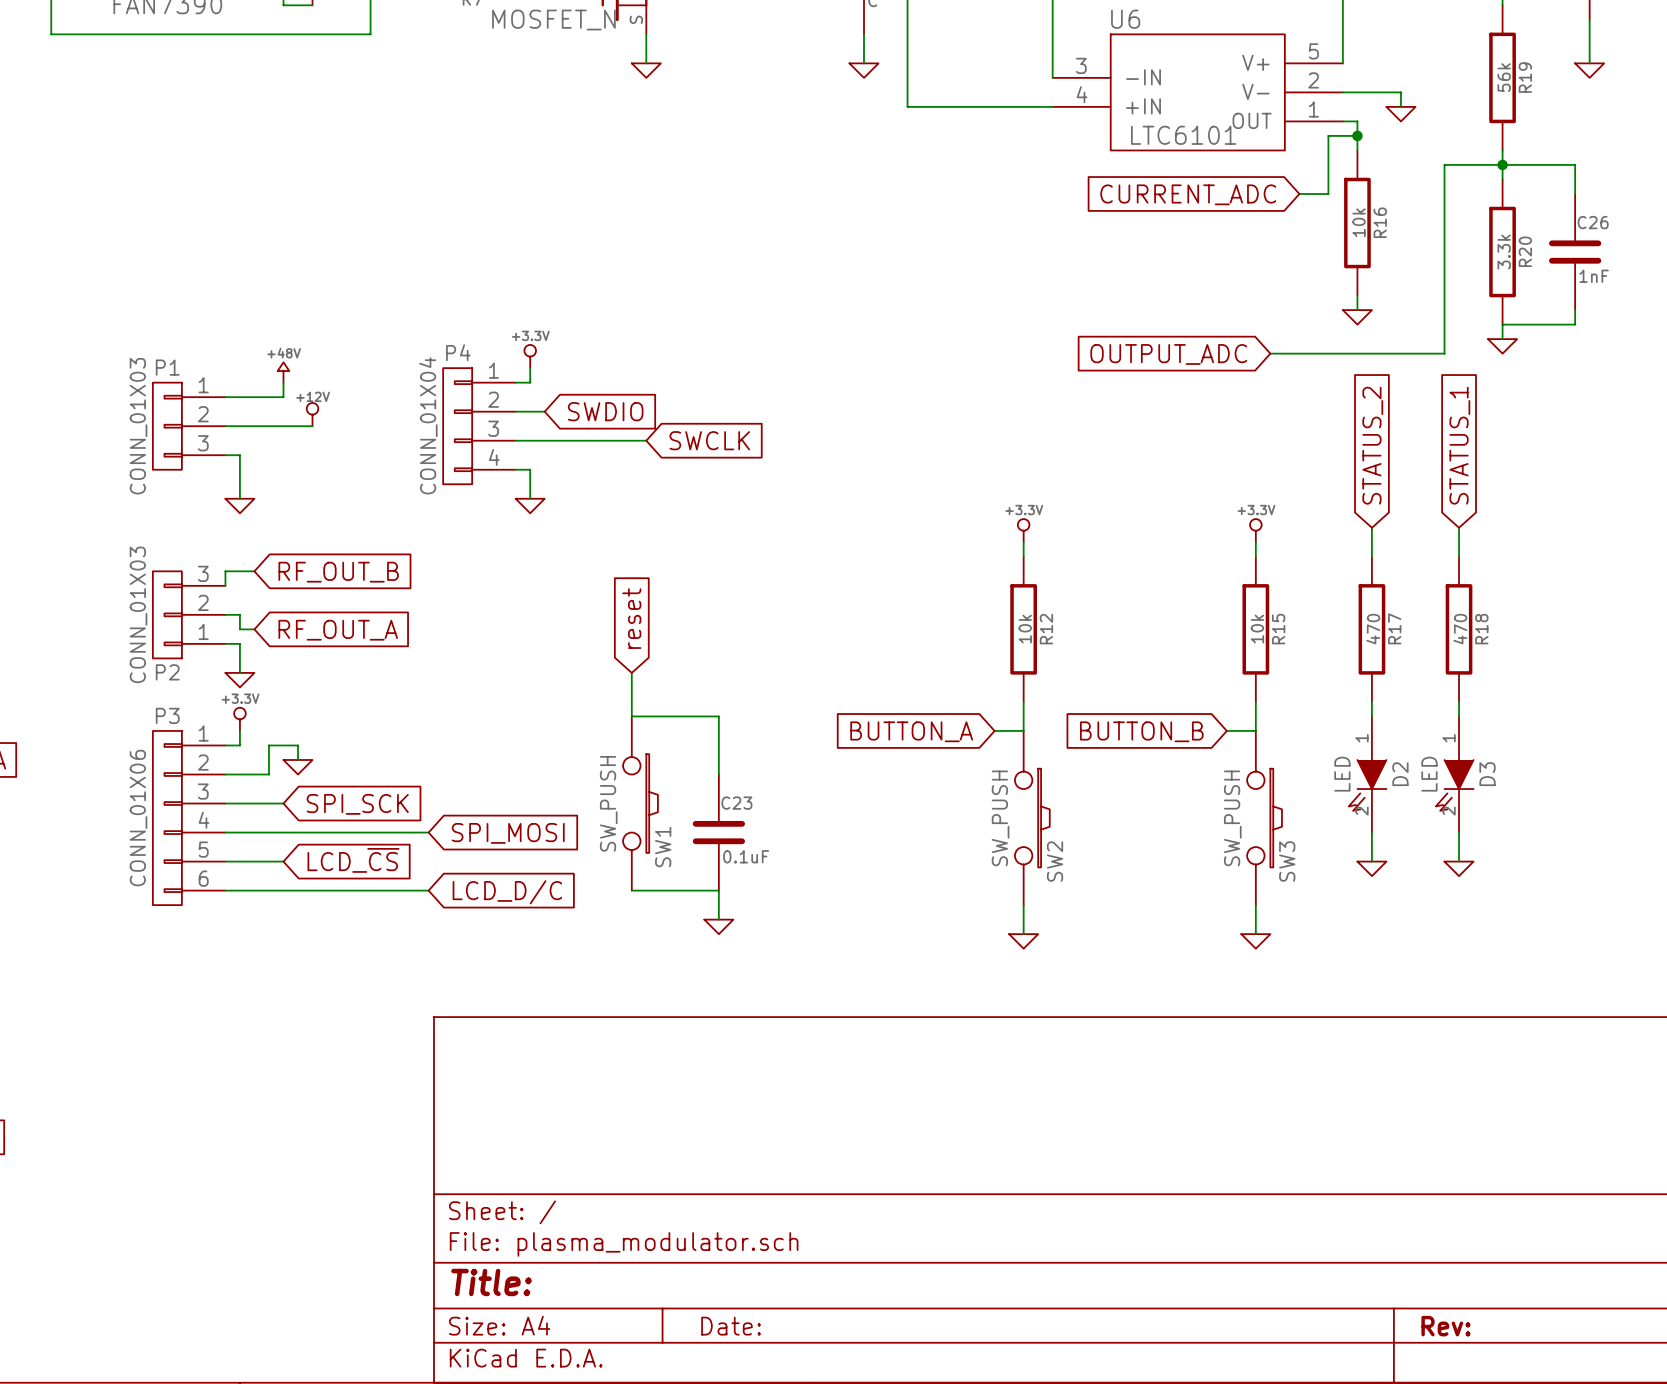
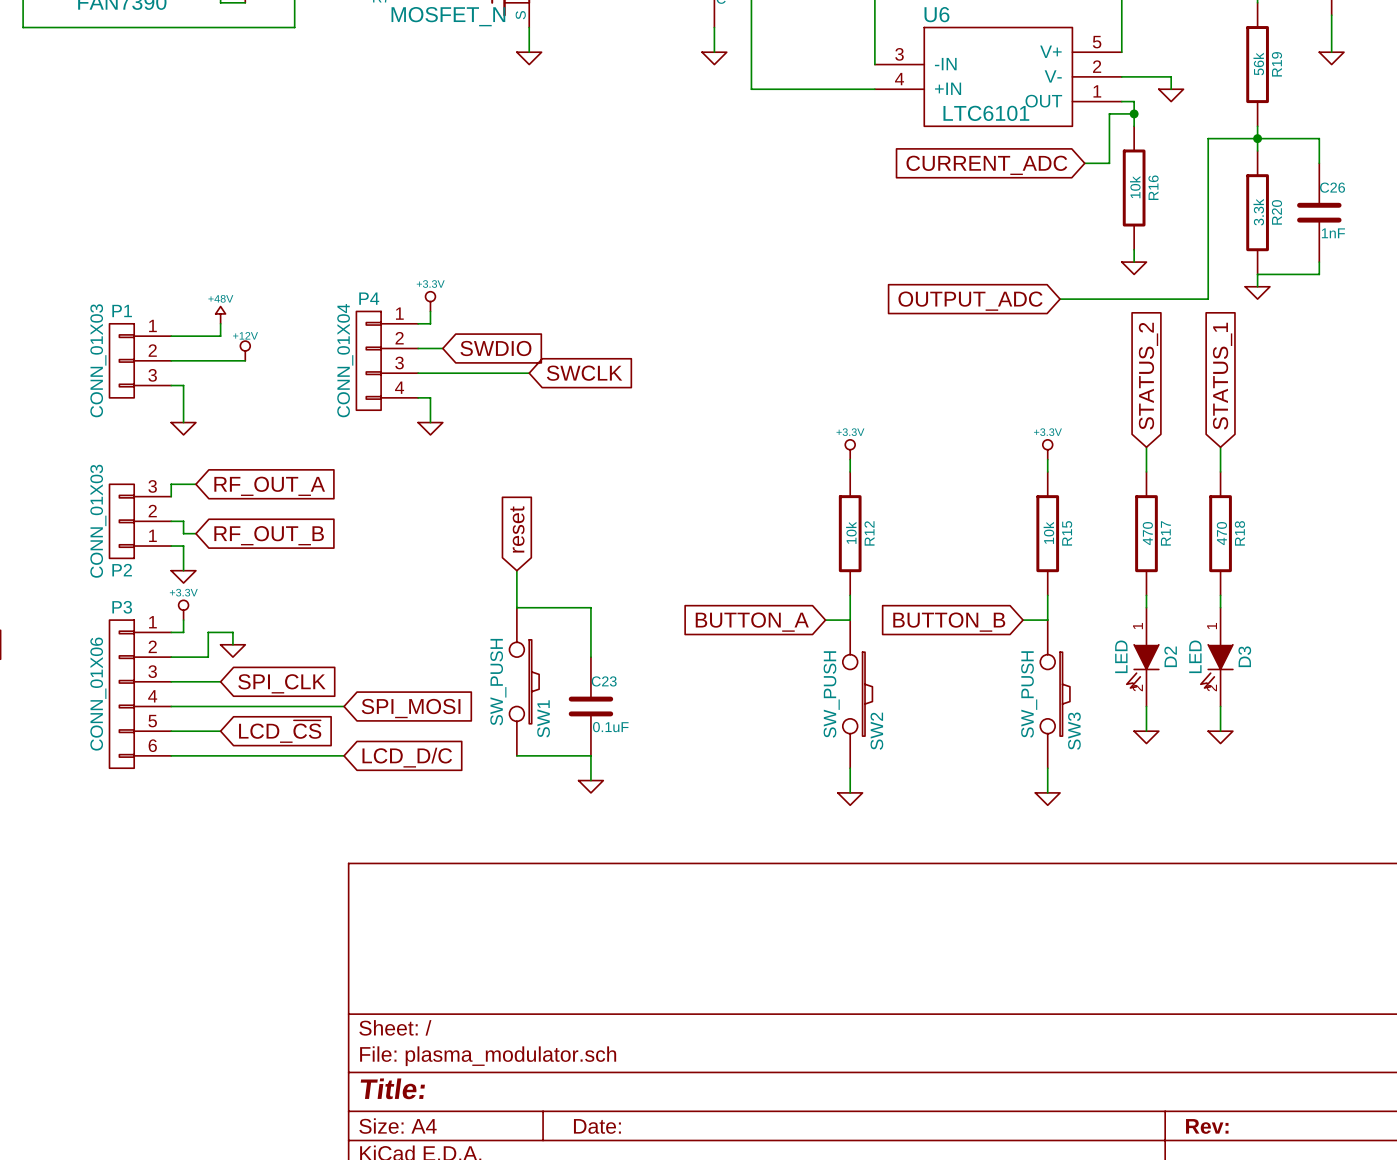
global label: RF_OUT_B (338, 572) -> RF_OUT_A (269, 486)
global label: RF_OUT_A (338, 630) -> RF_OUT_B (269, 535)
global label: SPI_SCK (357, 804) -> SPI_CLK (281, 683)

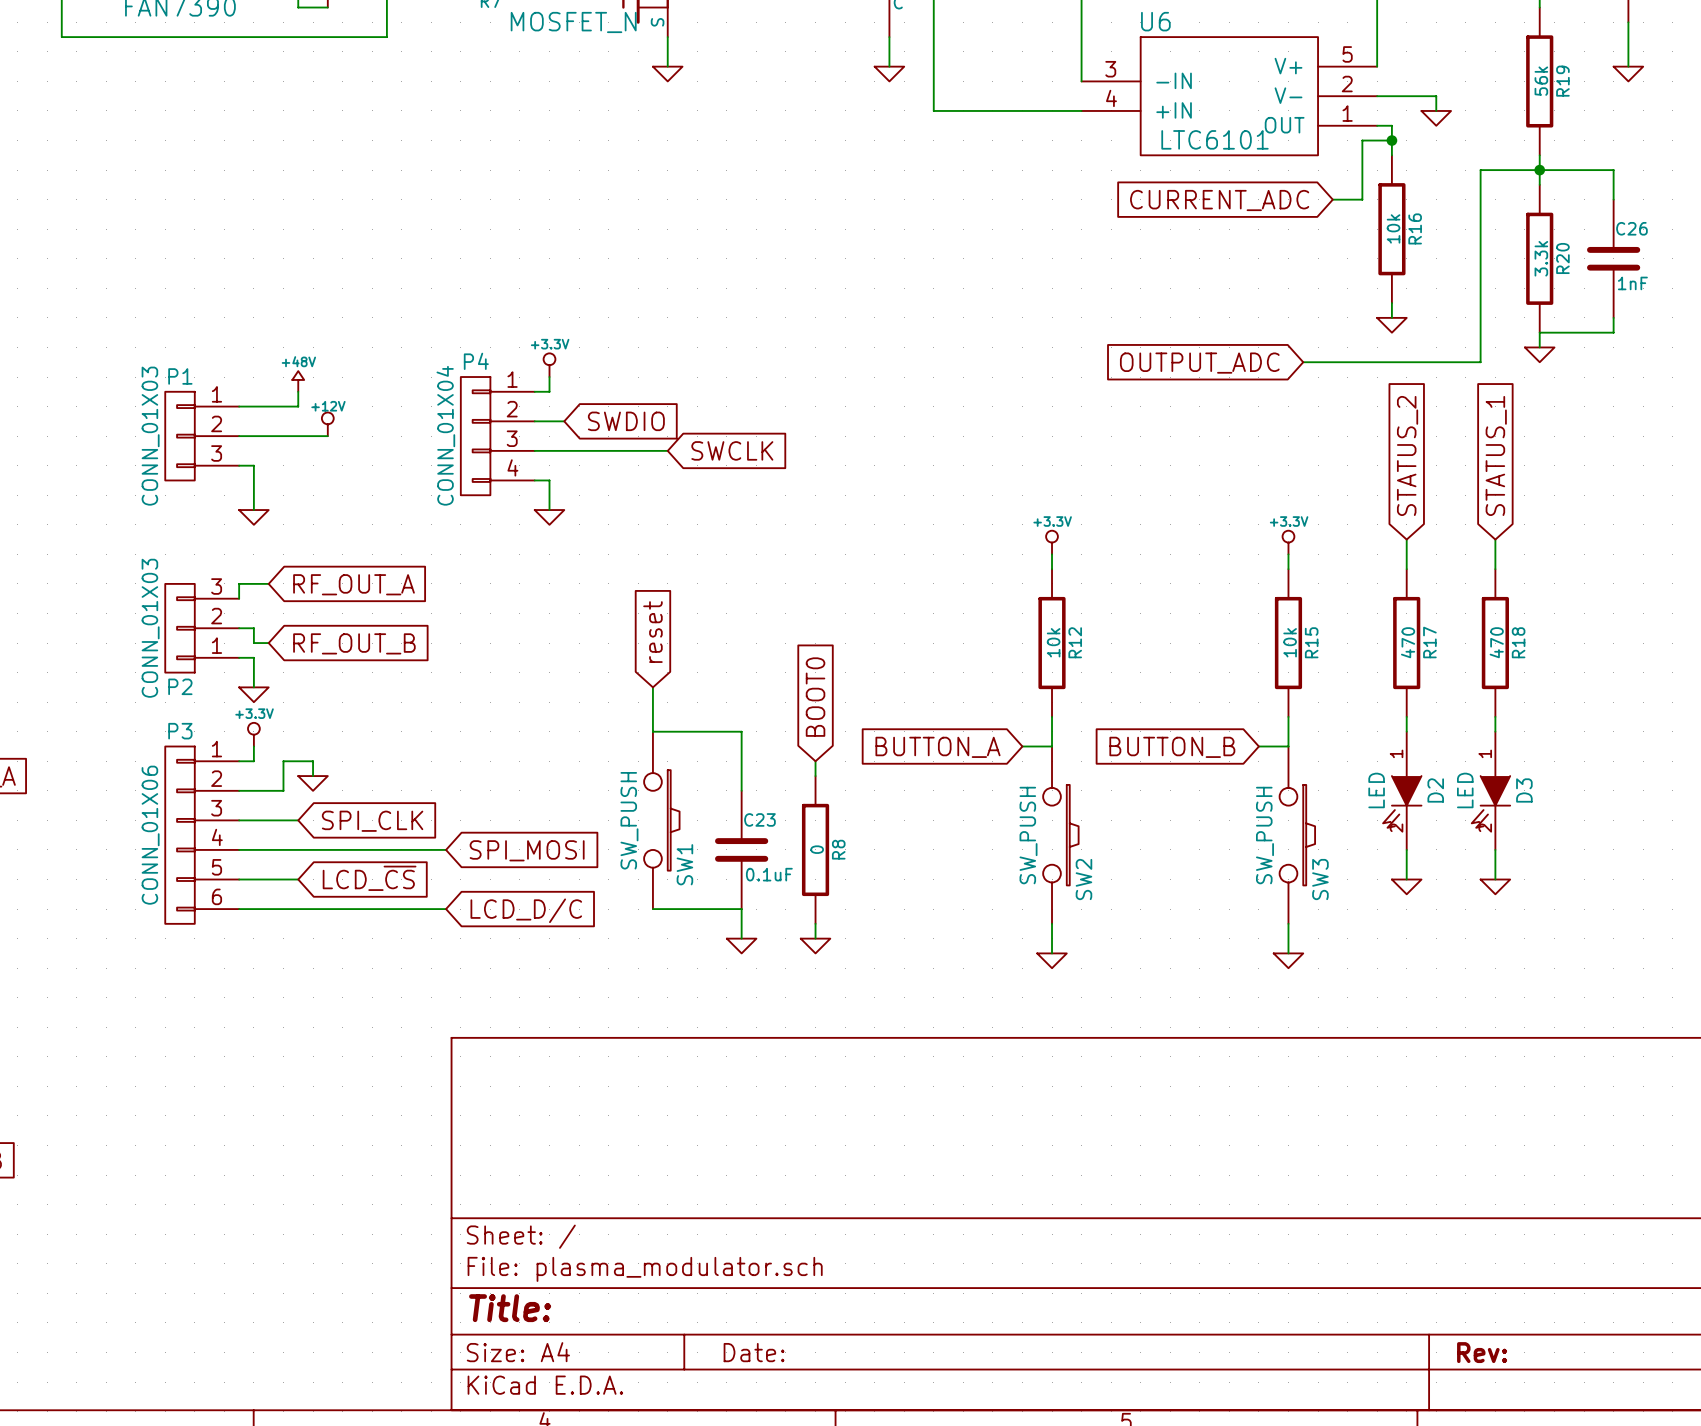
global label: none -> BOOT0 (815, 697)
wire: none -> (815, 761) (815, 776)
R8: none -> 0 (815, 849)
wire: none -> (815, 923) (815, 938)
power symbol: none -> (815, 946)

